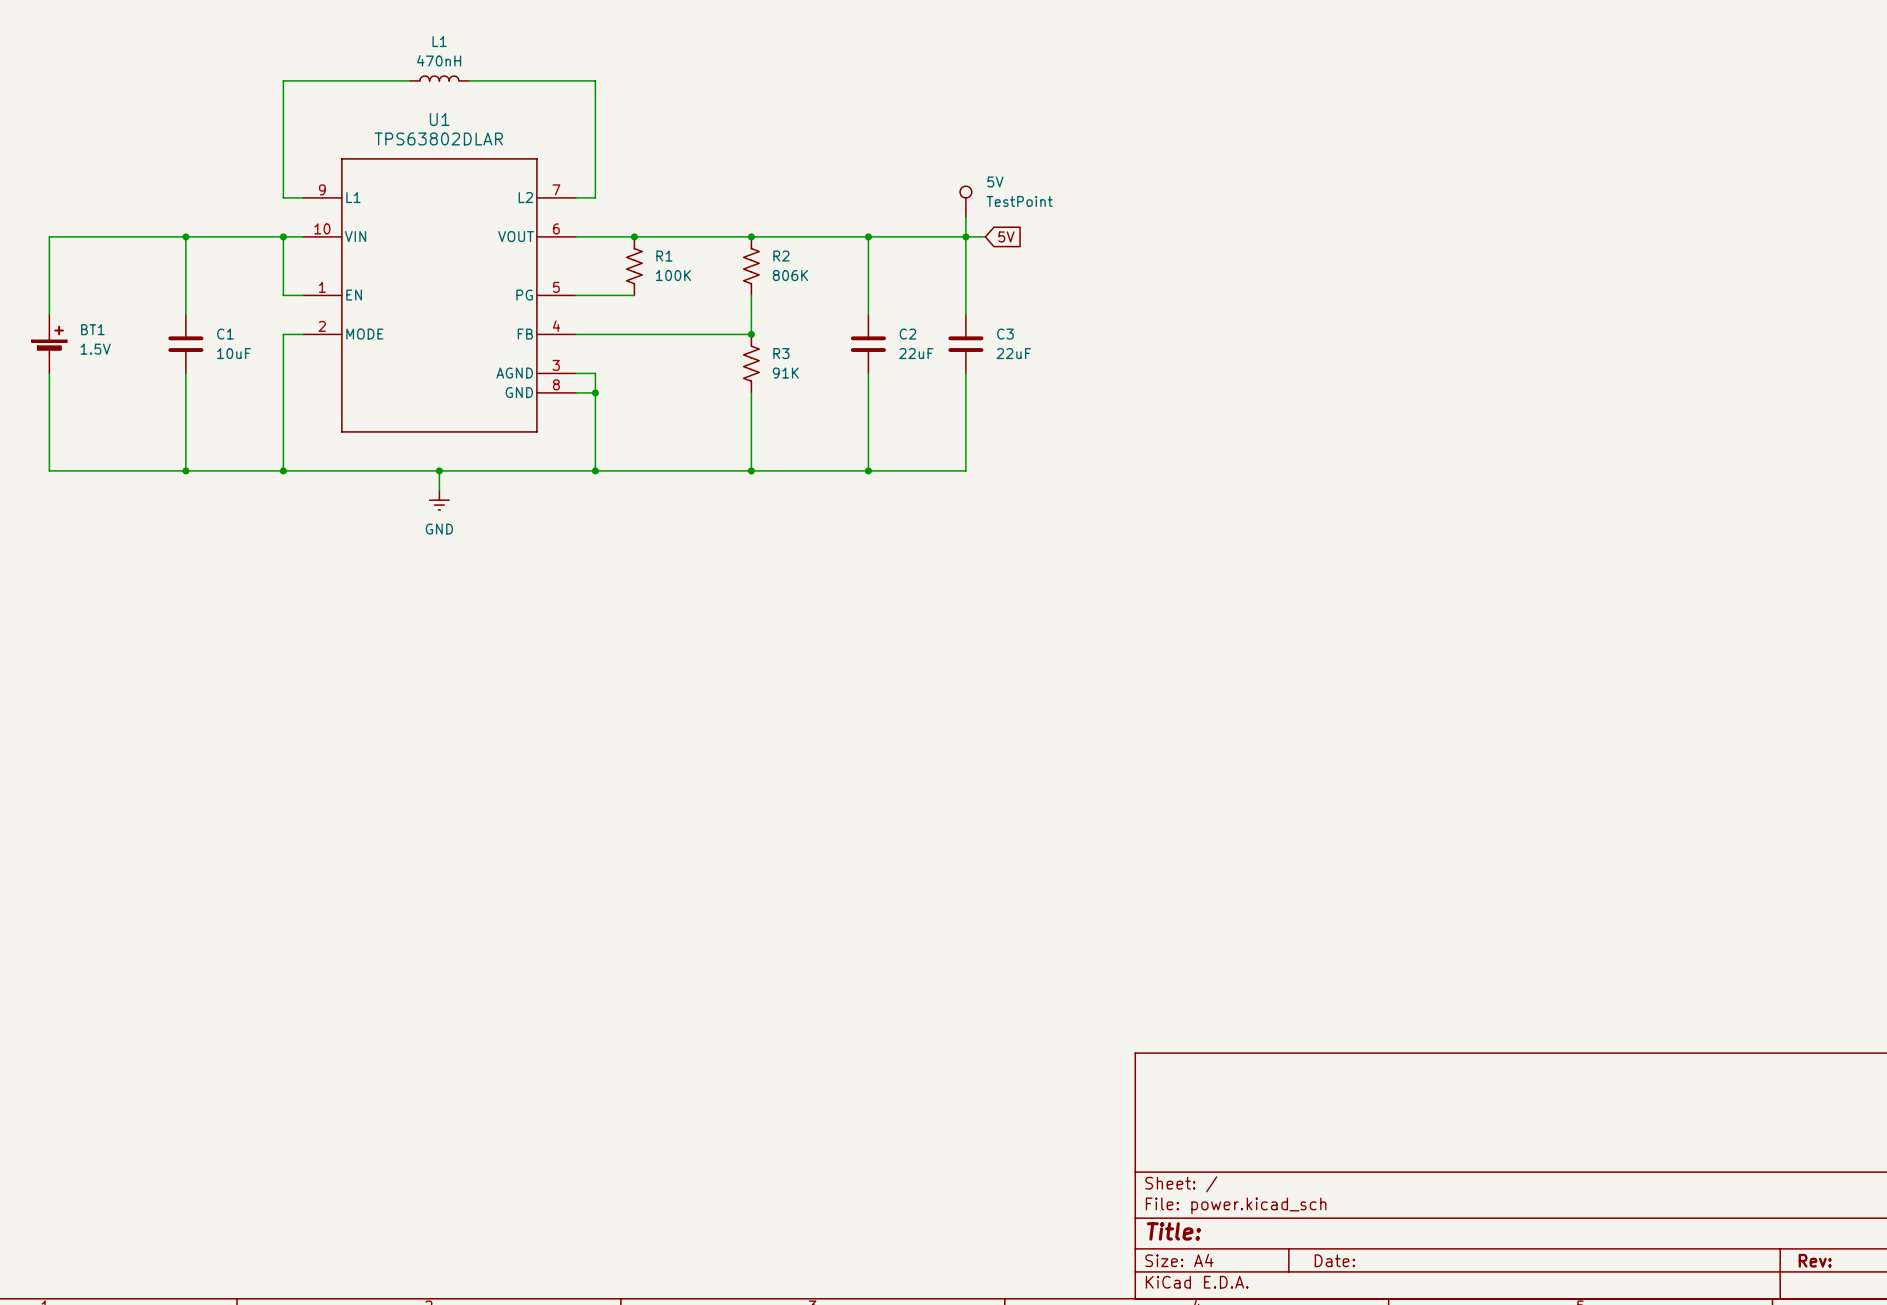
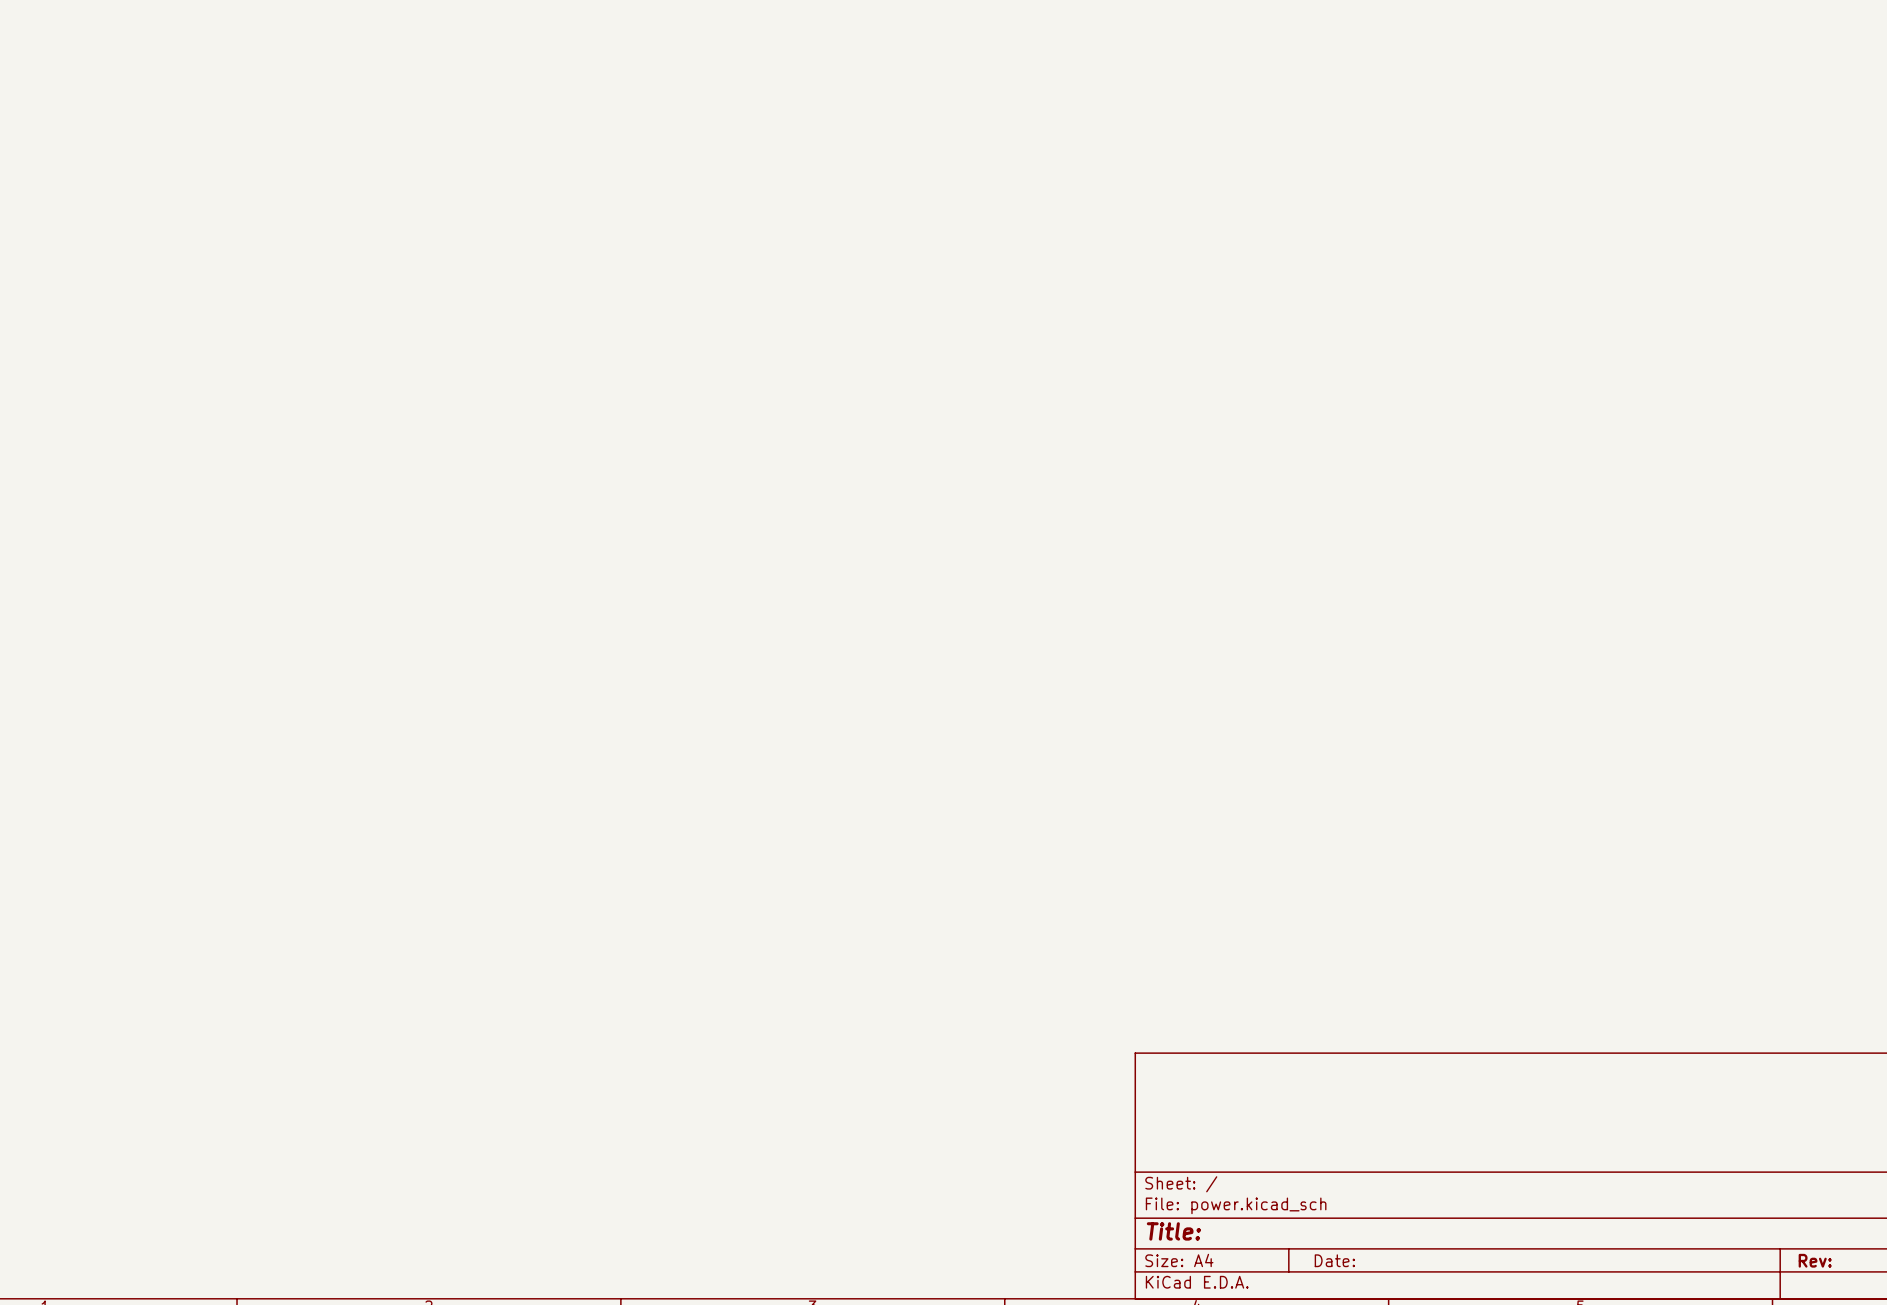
L1: 470nH (439, 78) -> none
wire: (410, 80) (283, 80) (283, 197) (302, 197) -> none
wire: (468, 80) (595, 80) (595, 197) (575, 197) -> none
5V: TestPoint (965, 201) -> none
wire: (965, 217) (965, 314) -> none
wire: (185, 236) (185, 314) -> none
junction: (185, 236) -> none
wire: (283, 236) (283, 295) (302, 295) -> none
junction: (283, 236) -> none
wire: (302, 236) (49, 236) (49, 314) -> none
wire: (575, 236) (985, 236) -> none
junction: (634, 236) -> none
junction: (751, 236) -> none
wire: (868, 236) (868, 314) -> none
junction: (868, 236) -> none
junction: (965, 236) -> none
global label: 5V (1006, 236) -> none
R1: 100K (634, 266) -> none
R2: 806K (751, 266) -> none
U1: TPS63802DLAR (439, 295) -> none
wire: (575, 295) (634, 295) -> none
wire: (751, 295) (751, 334) (575, 334) -> none
wire: (302, 334) (283, 334) (283, 470) -> none
junction: (751, 334) -> none
BT1: 1.5V (49, 344) -> none
C1: 10uF (185, 344) -> none
C2: 22uF (868, 344) -> none
C3: 22uF (965, 344) -> none
R3: 91K (751, 363) -> none
wire: (49, 373) (49, 470) (965, 470) (965, 373) -> none
wire: (185, 373) (185, 470) -> none
wire: (575, 373) (595, 373) (595, 470) -> none
wire: (868, 373) (868, 470) -> none
wire: (575, 392) (595, 392) -> none
junction: (595, 392) -> none
wire: (751, 392) (751, 470) -> none
junction: (185, 470) -> none
junction: (283, 470) -> none
wire: (439, 470) (439, 490) -> none
junction: (439, 470) -> none
junction: (595, 470) -> none
junction: (751, 470) -> none
junction: (868, 470) -> none
power symbol: GND (439, 500) -> none

